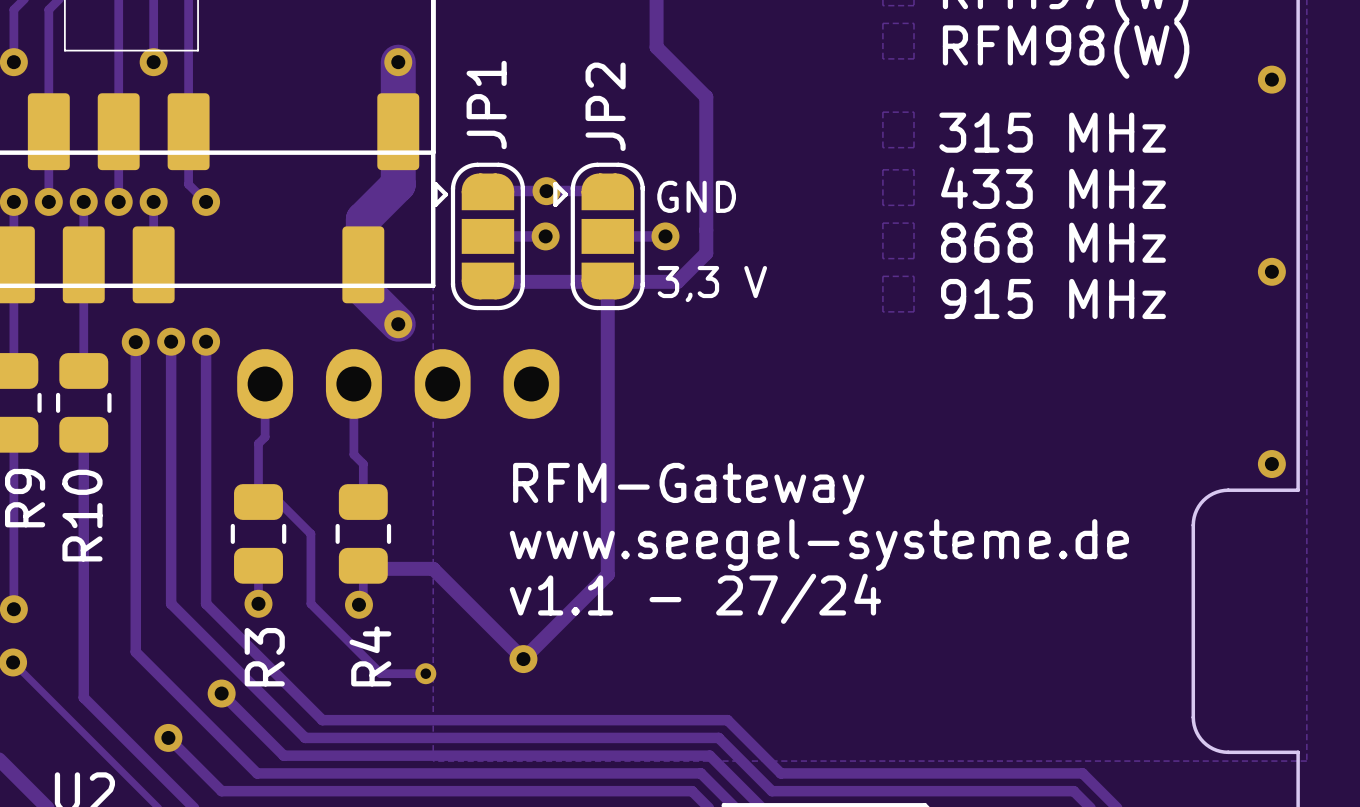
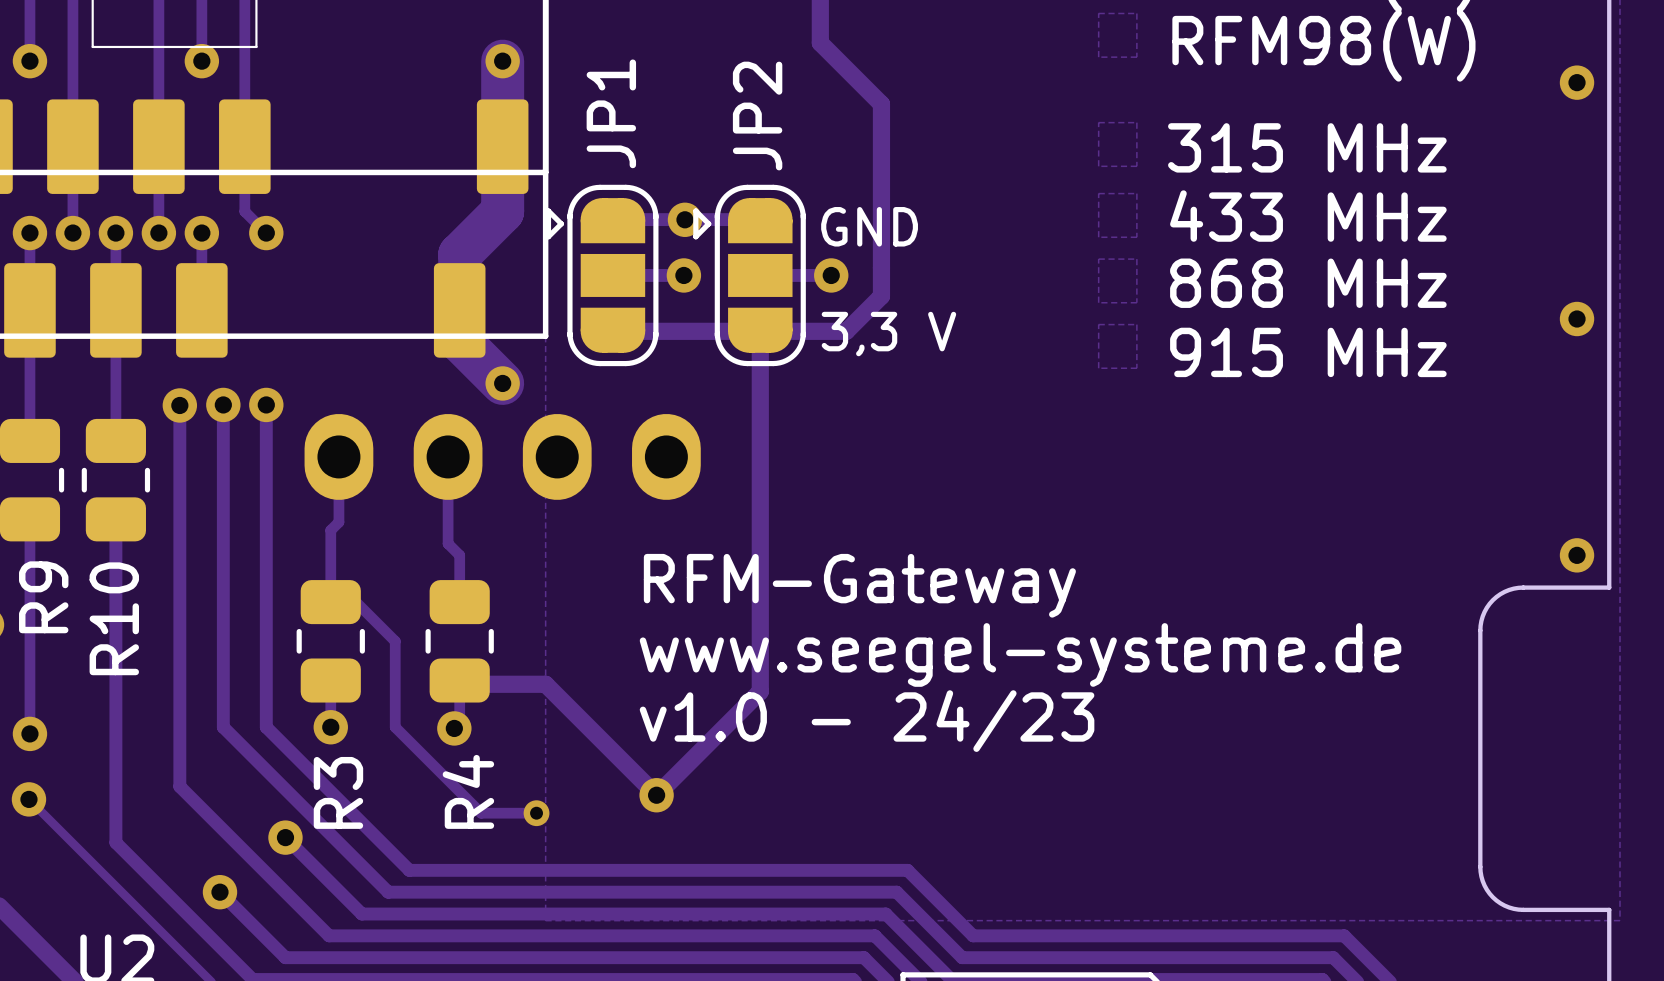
text: v1.1 - 27/24 (695, 598) -> v1.0 - 24/23 (867, 721)

